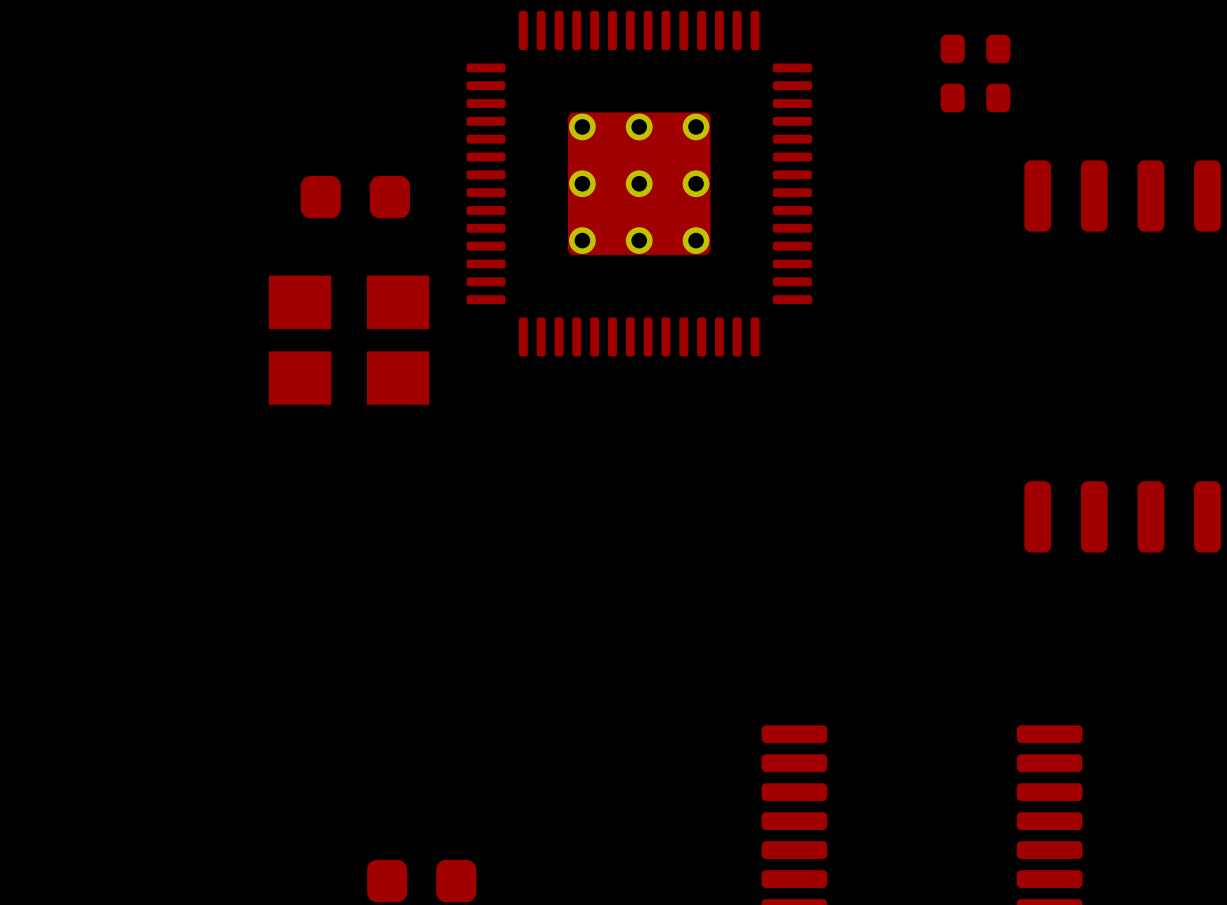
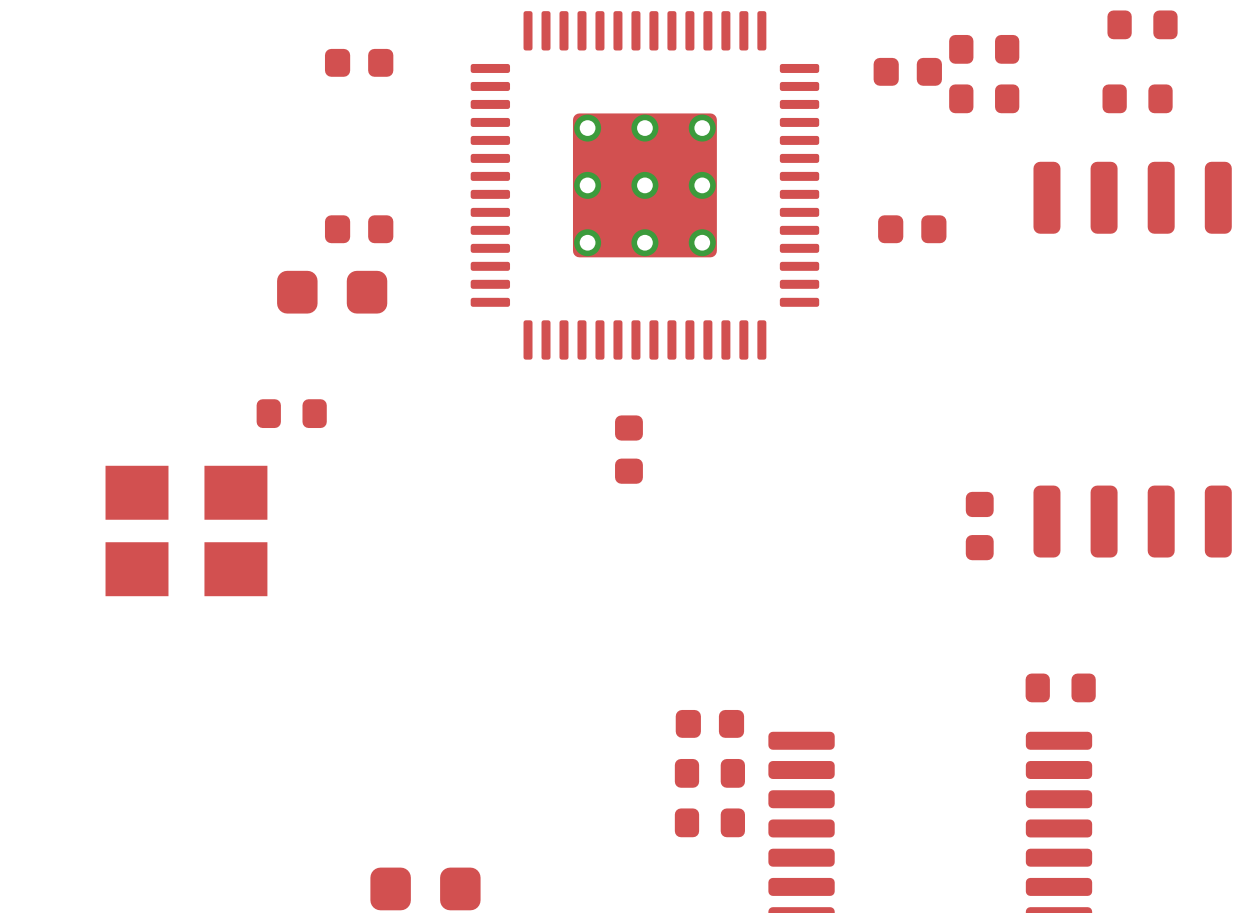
part: none -> (1142, 24)
part: none -> (359, 62)
part: none -> (907, 71)
part: none -> (1137, 98)
part footprint: [300, 175, 410, 219] -> [324, 215, 394, 244]
part: none -> (912, 229)
part: none -> (332, 292)
part position: (349, 340) -> (186, 530)
part: none -> (291, 413)
part: none -> (628, 449)
part: none -> (979, 526)
part: none -> (1060, 687)
part: none -> (709, 723)
part: none -> (709, 773)
part: none -> (709, 822)

